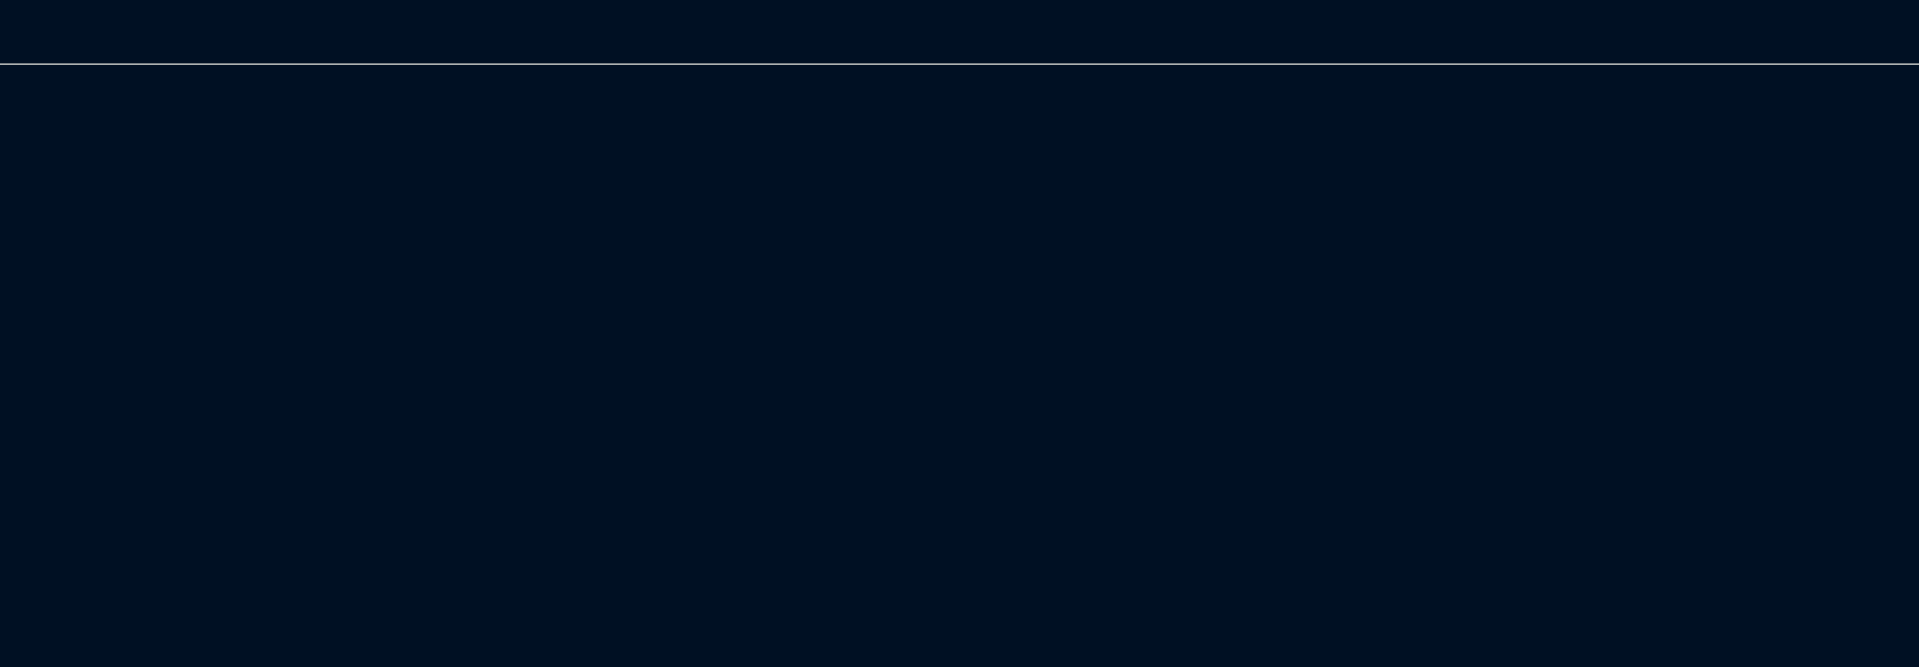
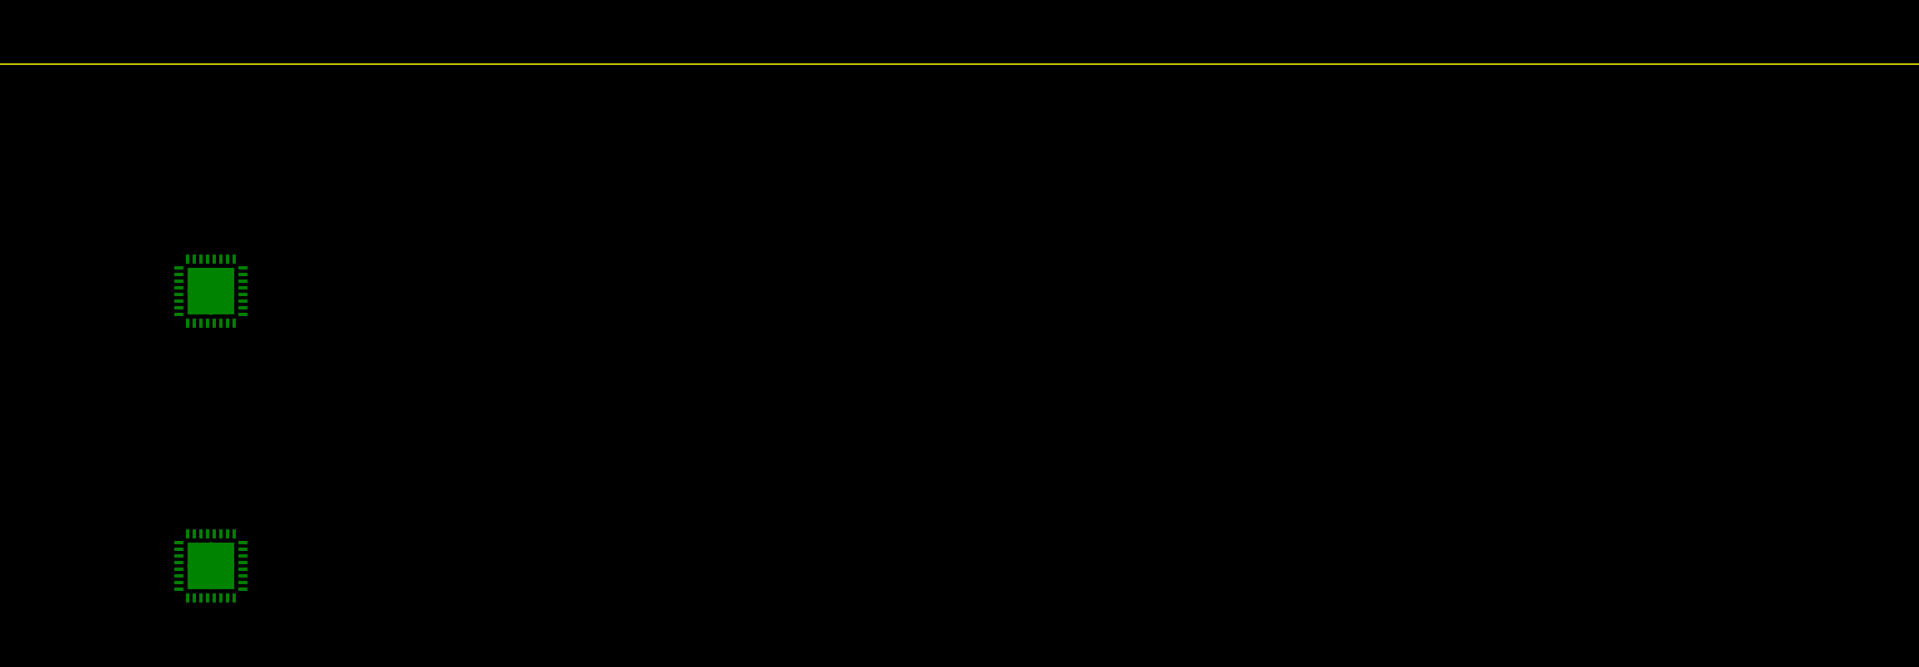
part: none -> (210, 291)
part: none -> (210, 565)

